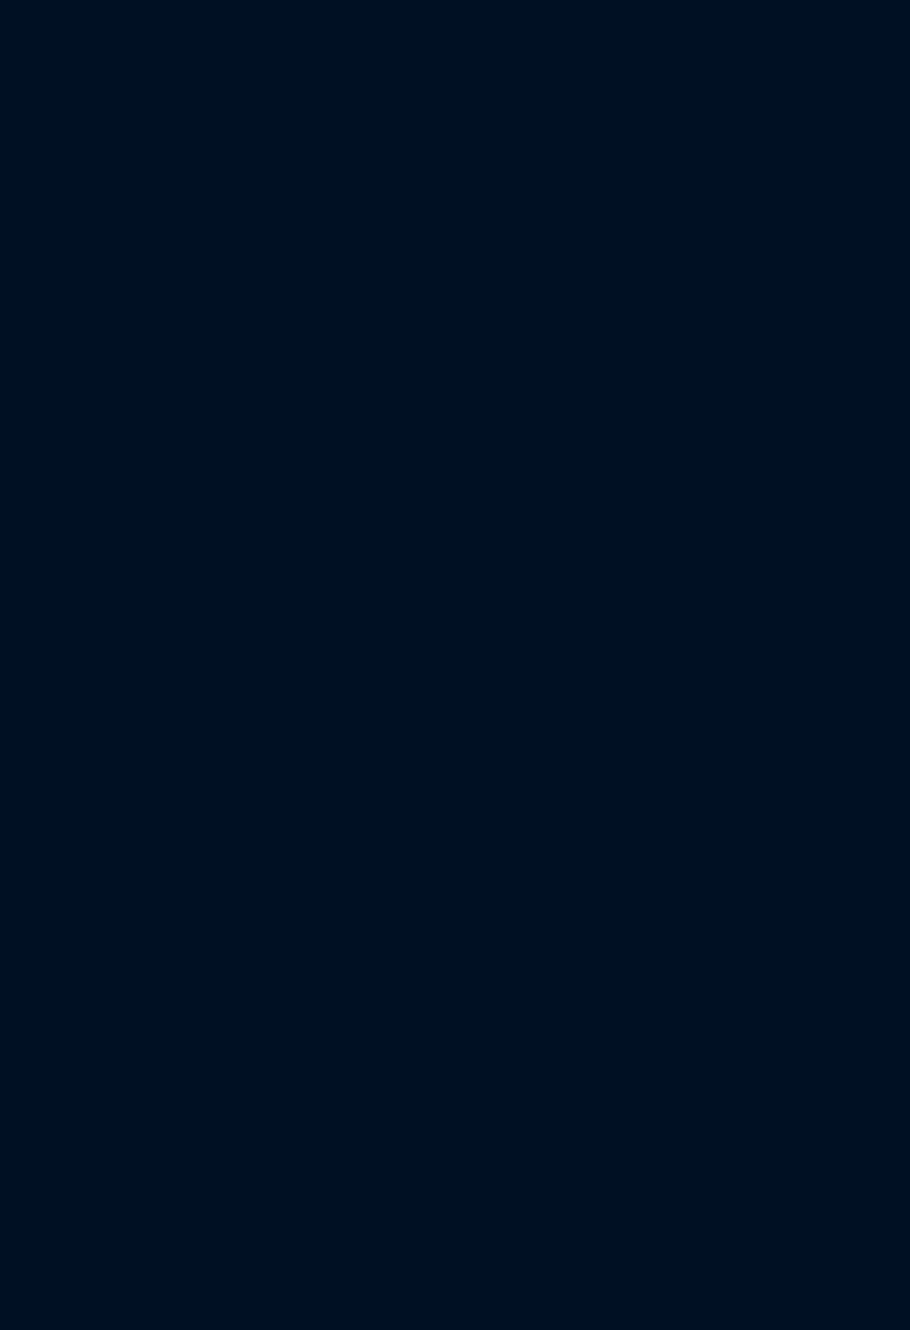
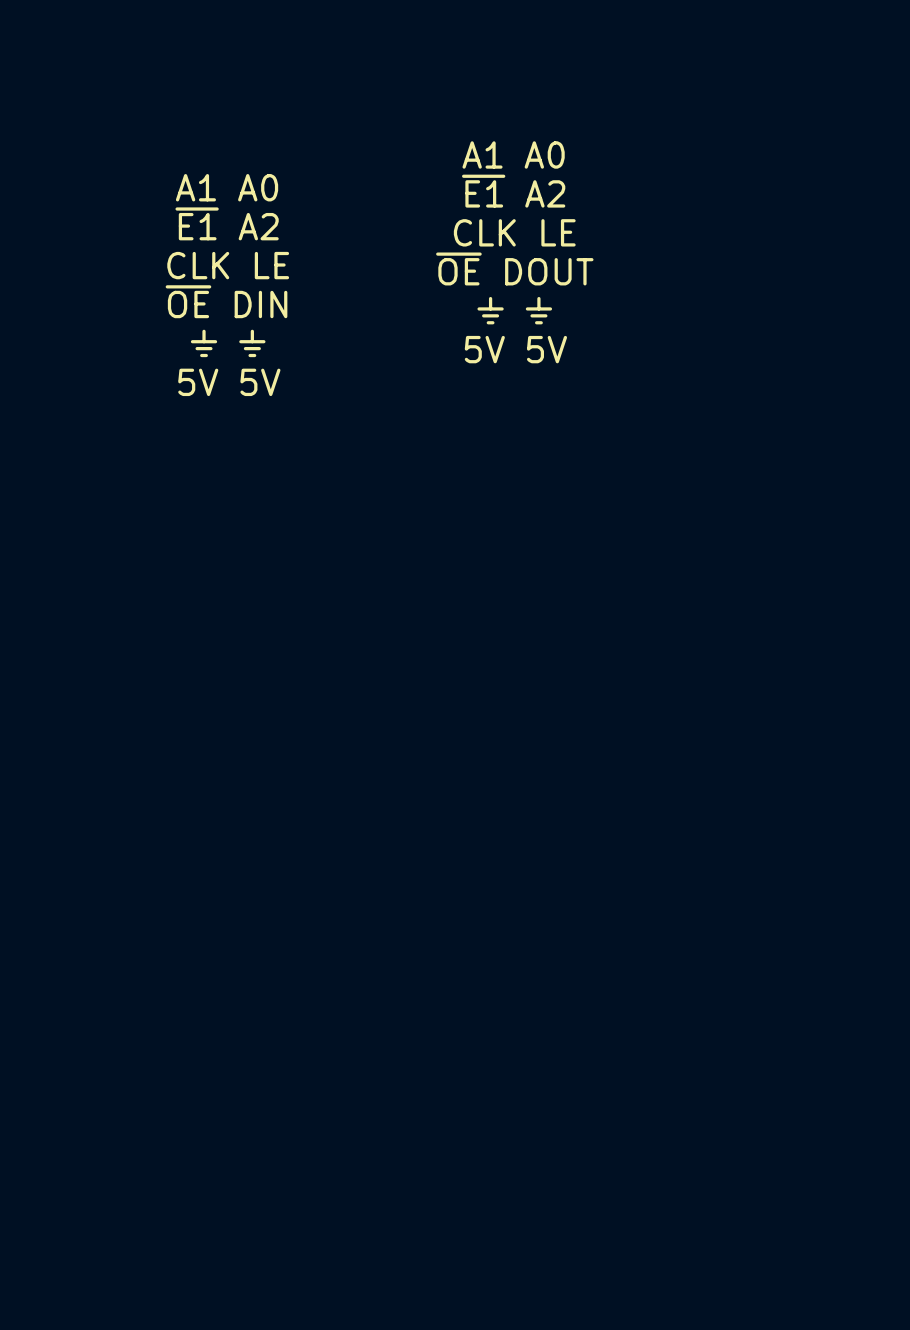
text: none -> A1 A0 (513, 154)
text: none -> A1 A0 (227, 187)
text: none -> ~{E1} A2 (513, 191)
text: none -> ~{E1} A2 (227, 223)
text: none -> CLK LE (514, 232)
text: none -> CLK LE (228, 265)
text: none -> ~{OE} DOUT (514, 268)
text: none -> ~{OE} DIN (226, 301)
text: none -> ⏚ ⏚ (514, 310)
text: none -> ⏚ ⏚ (228, 343)
text: none -> 5V 5V (515, 349)
text: none -> 5V 5V (229, 382)

